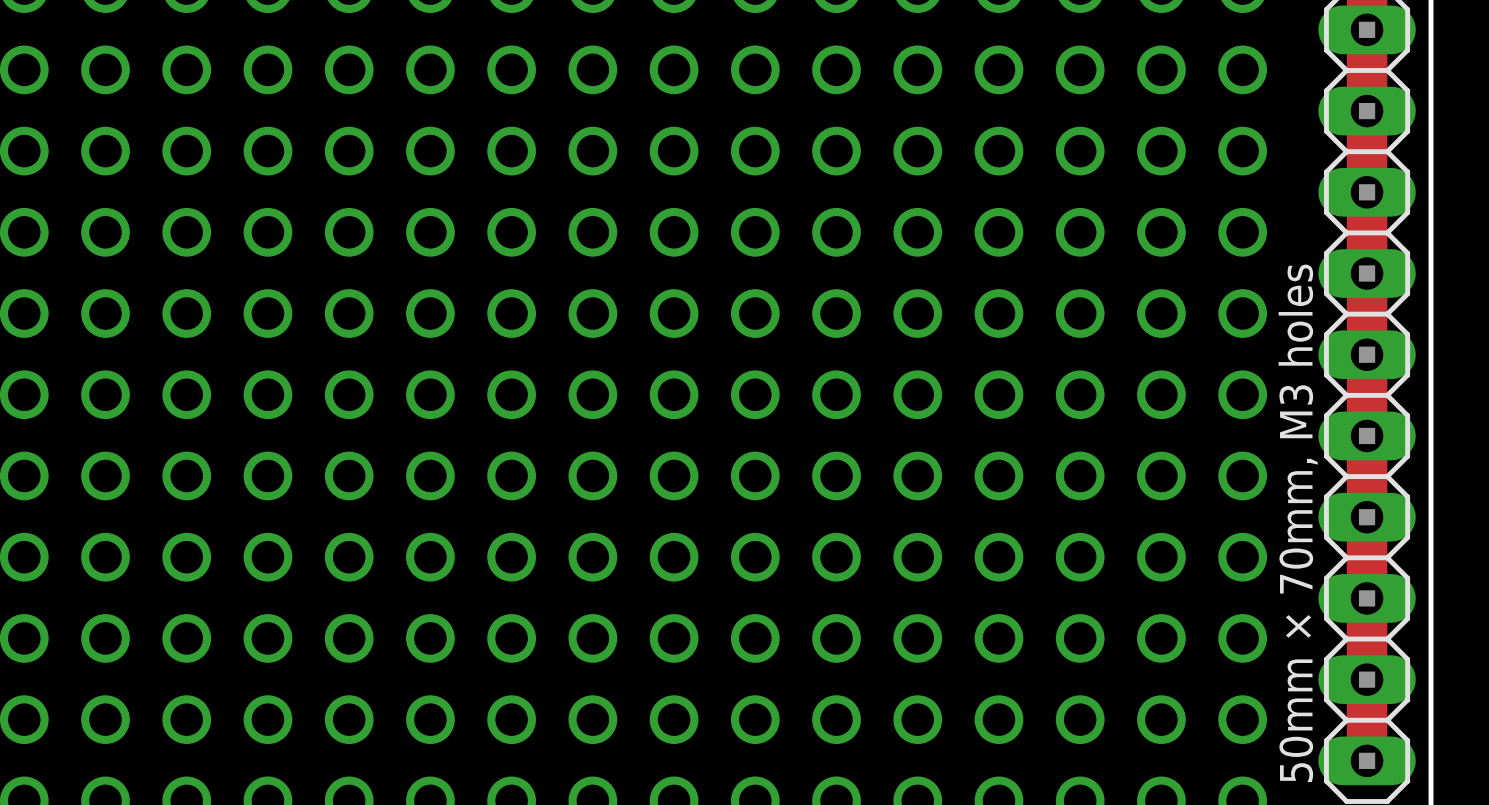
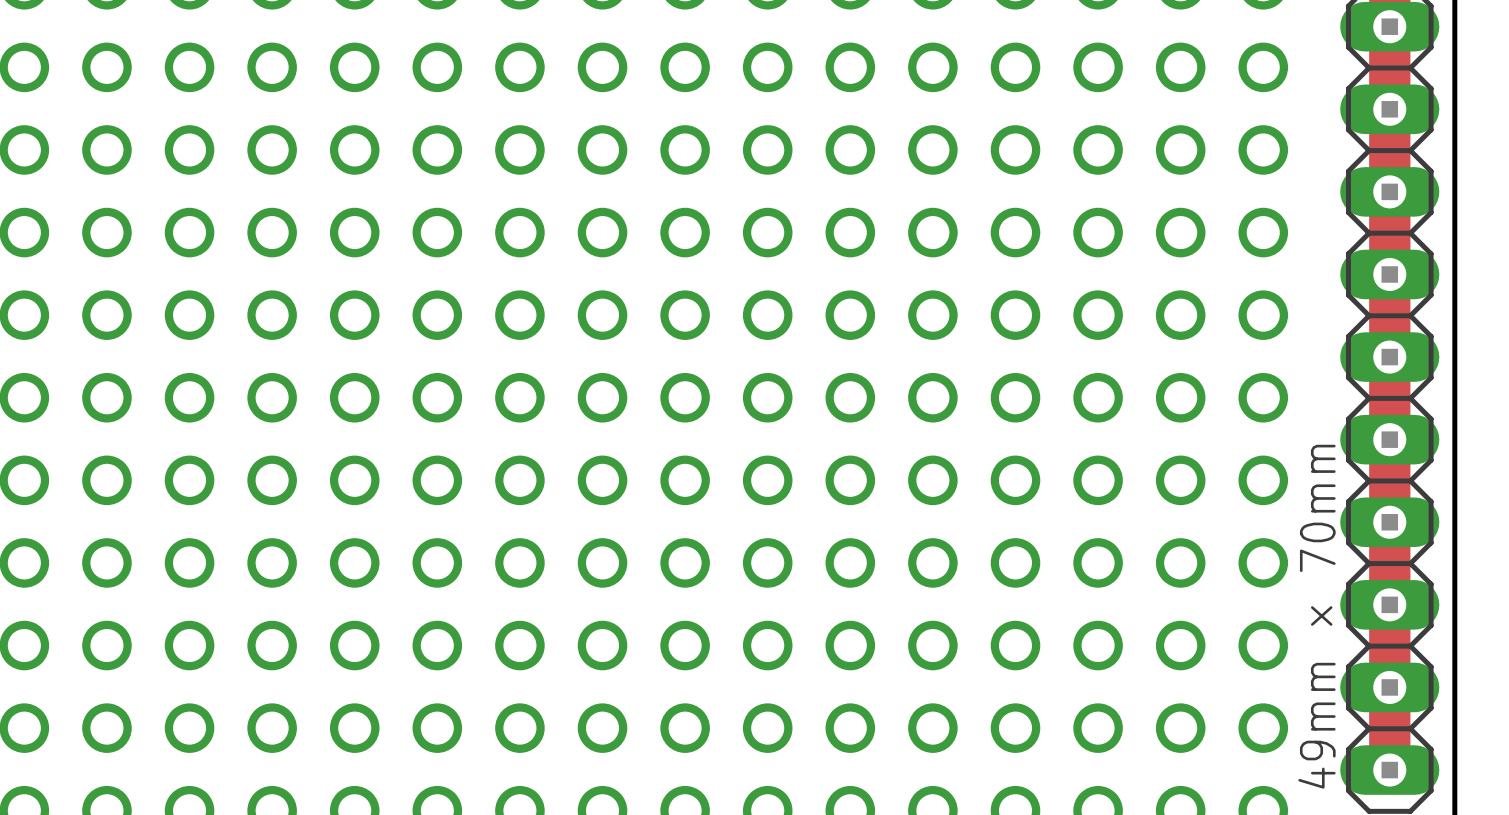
text: 50mm × 70mm, M3 holes (1298, 523) -> 49mm × 70mm (1317, 616)

